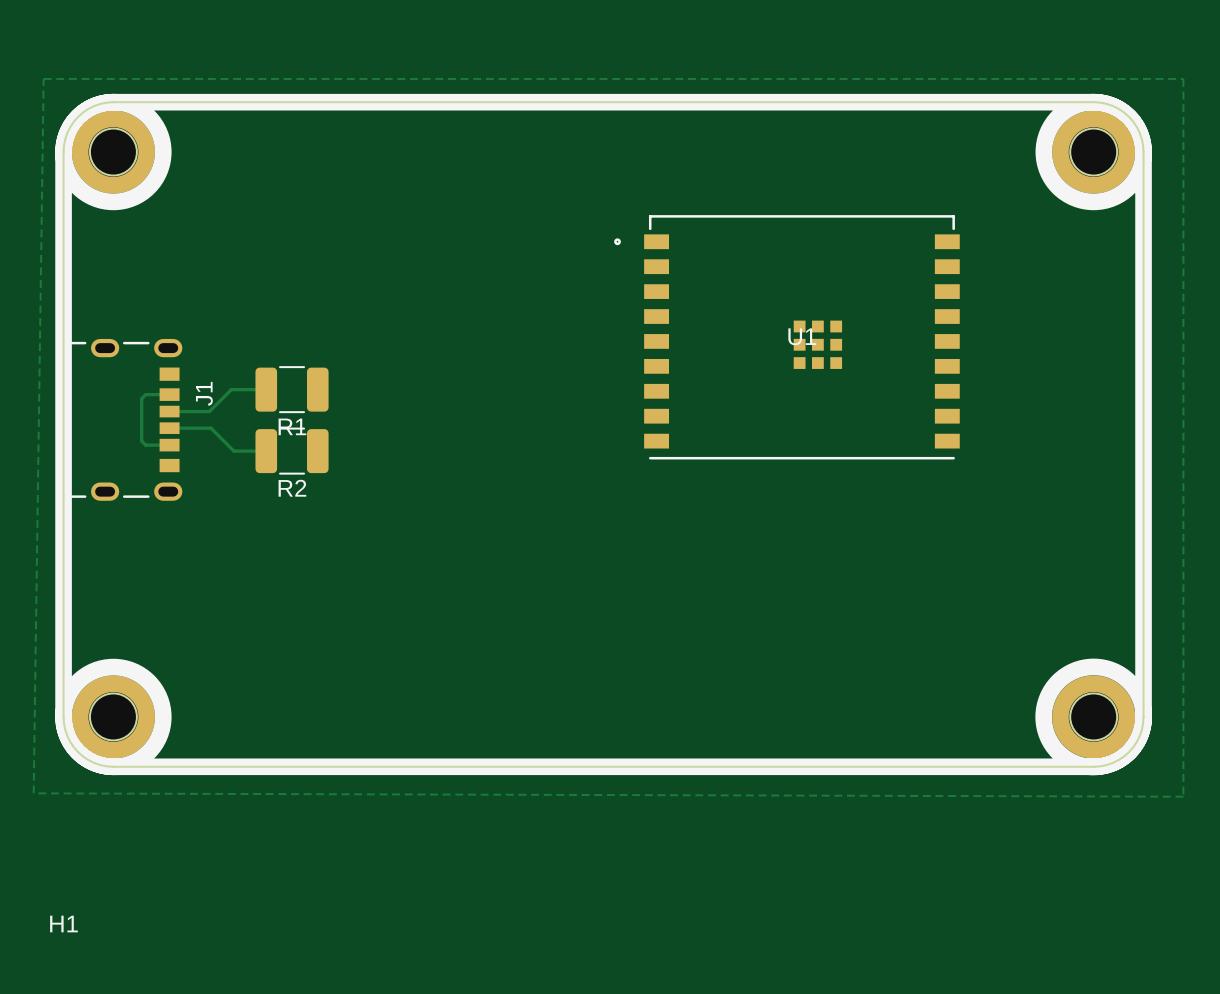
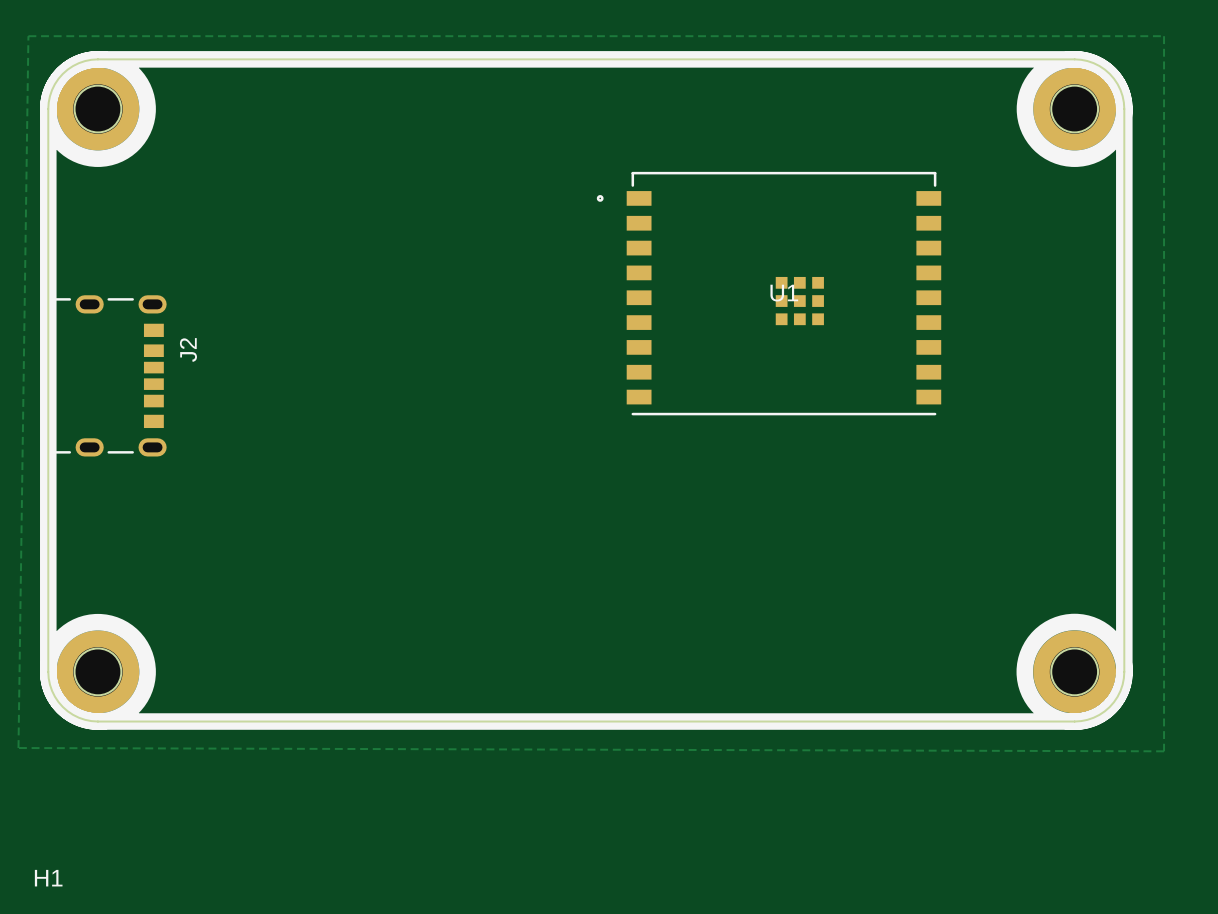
track: (266, 389) (231, 389) (209, 411) (169, 411) -> none
R1: (292, 389) -> none
J1 name: J1 (204, 393) -> J2 (188, 350)
track: (169, 394) (145, 394) (141, 398) (141, 441) (145, 445) (169, 445) -> none
track: (169, 428) (210, 428) (233, 451) (266, 451) -> none
R2: (292, 451) -> none

